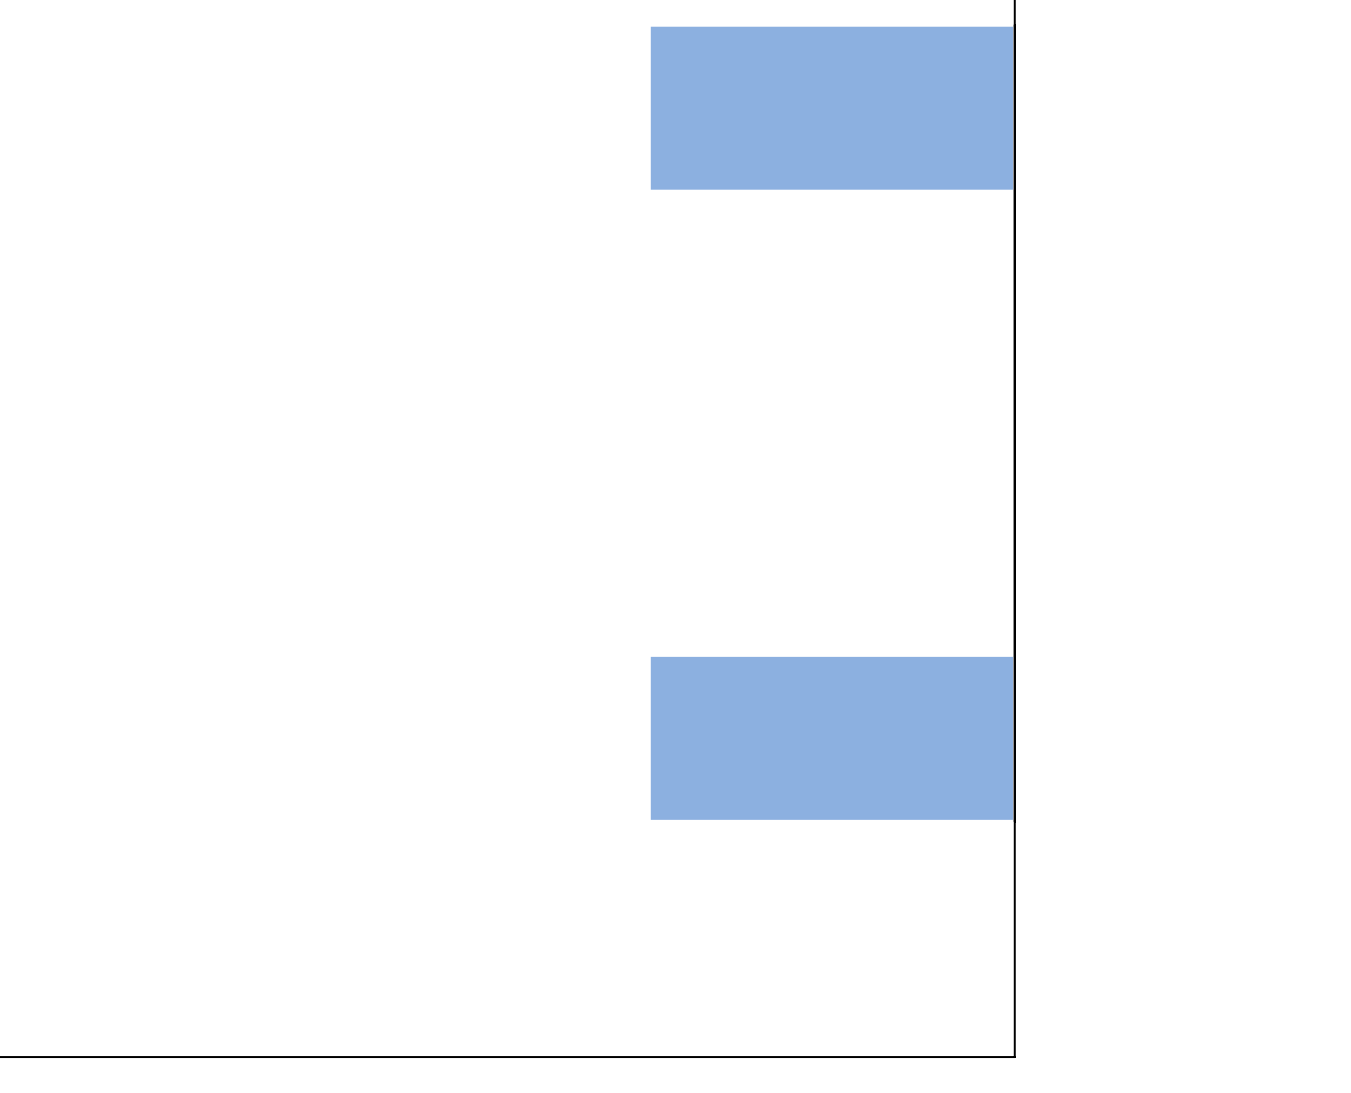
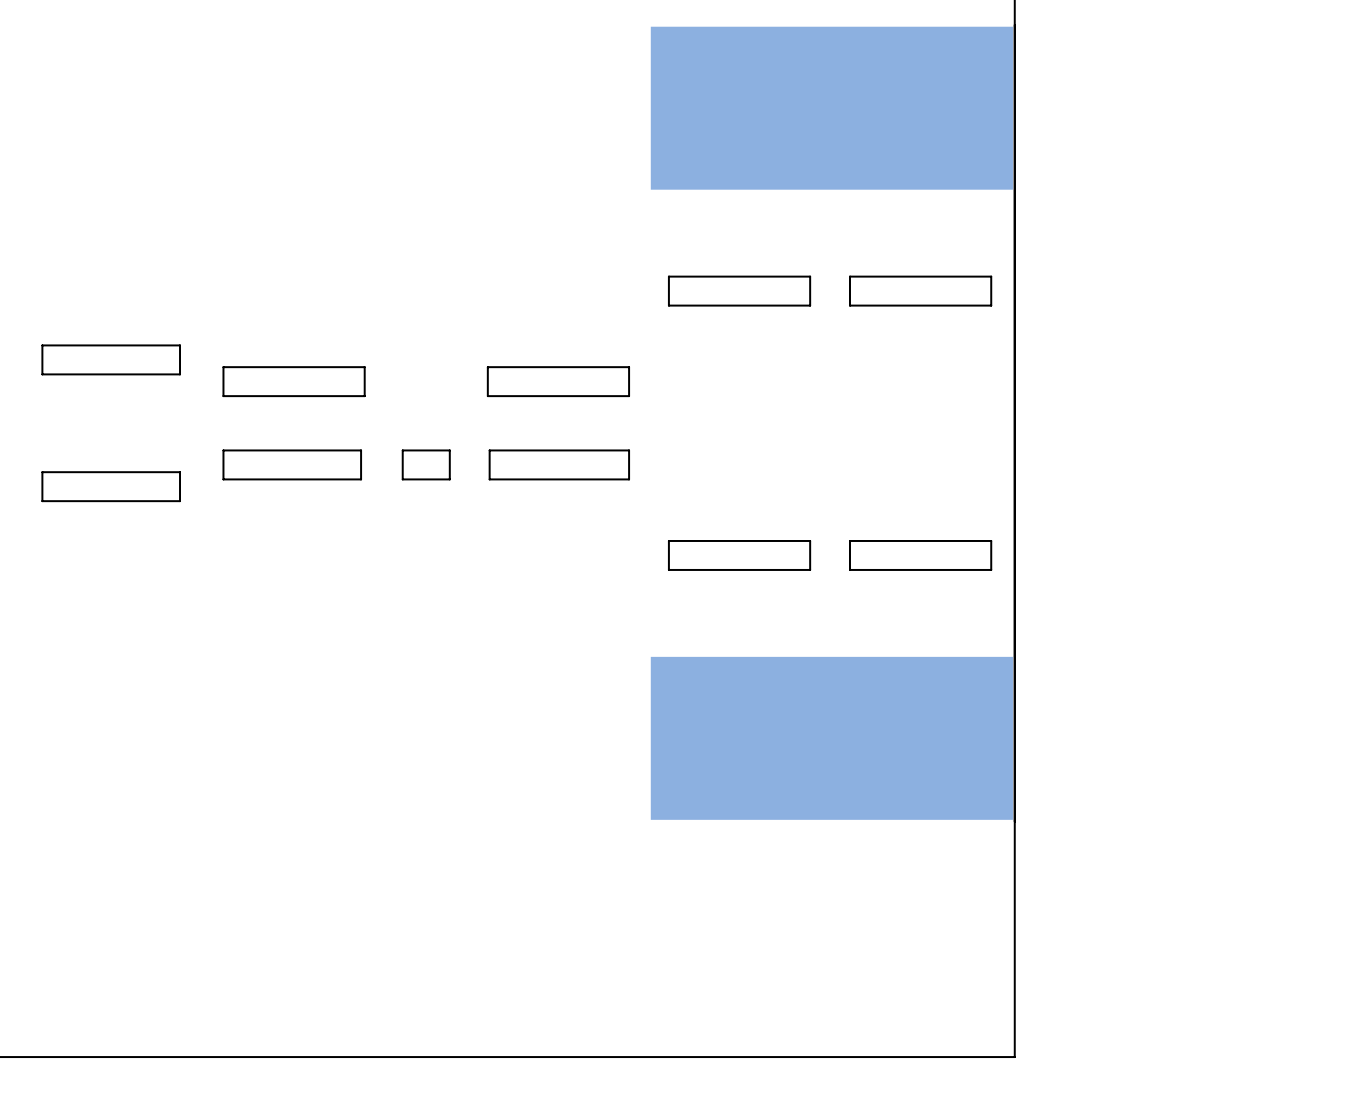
board edge: none -> (810, 276) (668, 276) (668, 305) (810, 305) (810, 276)
board edge: none -> (991, 276) (849, 276) (849, 305) (991, 305) (991, 276)
board edge: none -> (180, 345) (180, 374) (42, 374) (42, 345) (180, 345)
board edge: none -> (364, 367) (223, 367) (223, 396) (364, 396) (364, 367)
board edge: none -> (629, 367) (487, 367) (487, 396) (629, 396) (629, 367)
board edge: none -> (361, 450) (223, 450) (223, 479) (361, 479) (361, 450)
board edge: none -> (449, 450) (402, 450) (402, 479) (449, 479) (449, 450)
board edge: none -> (629, 450) (489, 450) (489, 479) (629, 479) (629, 450)
board edge: none -> (180, 472) (42, 472) (42, 501) (180, 501) (180, 472)
board edge: none -> (810, 540) (810, 569) (668, 569) (668, 540) (810, 540)
board edge: none -> (991, 540) (991, 569) (849, 569) (849, 540) (991, 540)

